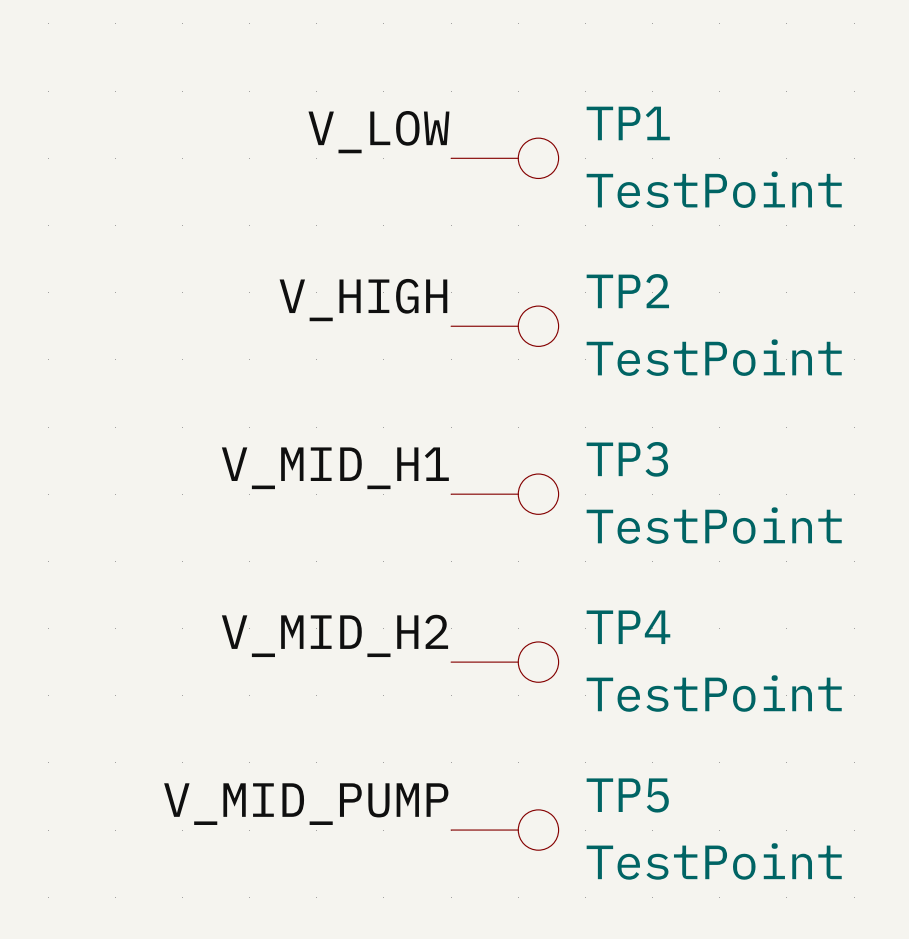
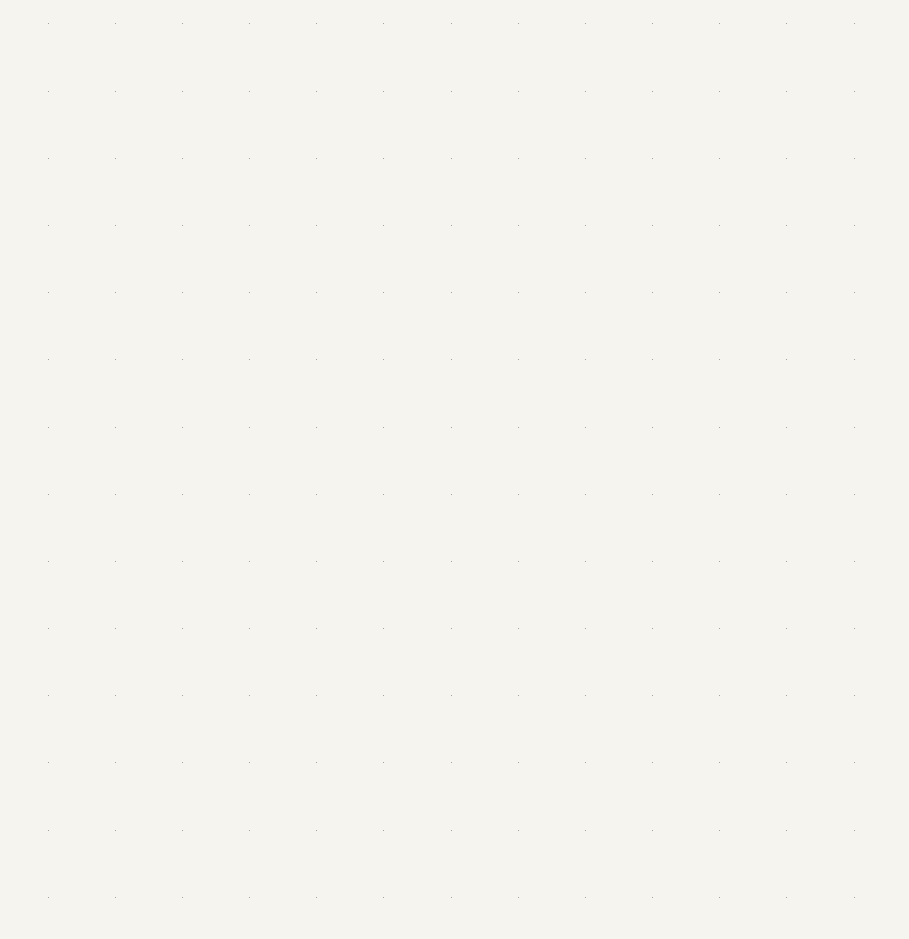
label: V_LOW (378, 132) -> none
TP1: TestPoint (504, 158) -> none
label: V_HIGH (363, 300) -> none
TP2: TestPoint (504, 326) -> none
label: V_MID_H1 (335, 468) -> none
TP3: TestPoint (504, 494) -> none
label: V_MID_H2 (334, 635) -> none
TP4: TestPoint (504, 662) -> none
label: V_MID_PUMP (306, 804) -> none
TP5: TestPoint (504, 830) -> none

